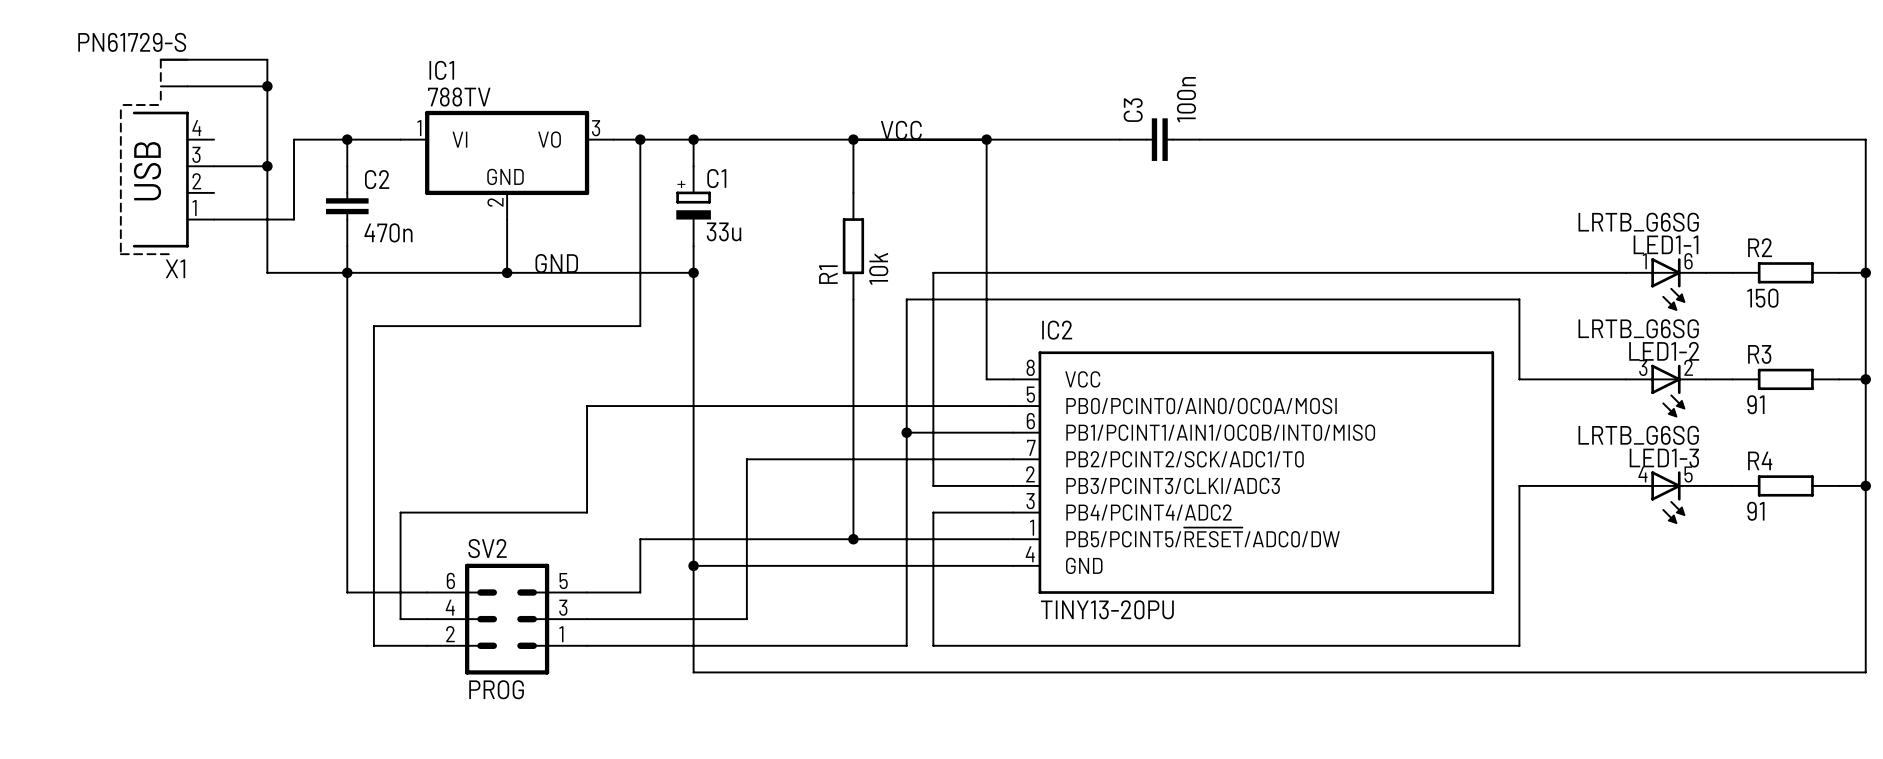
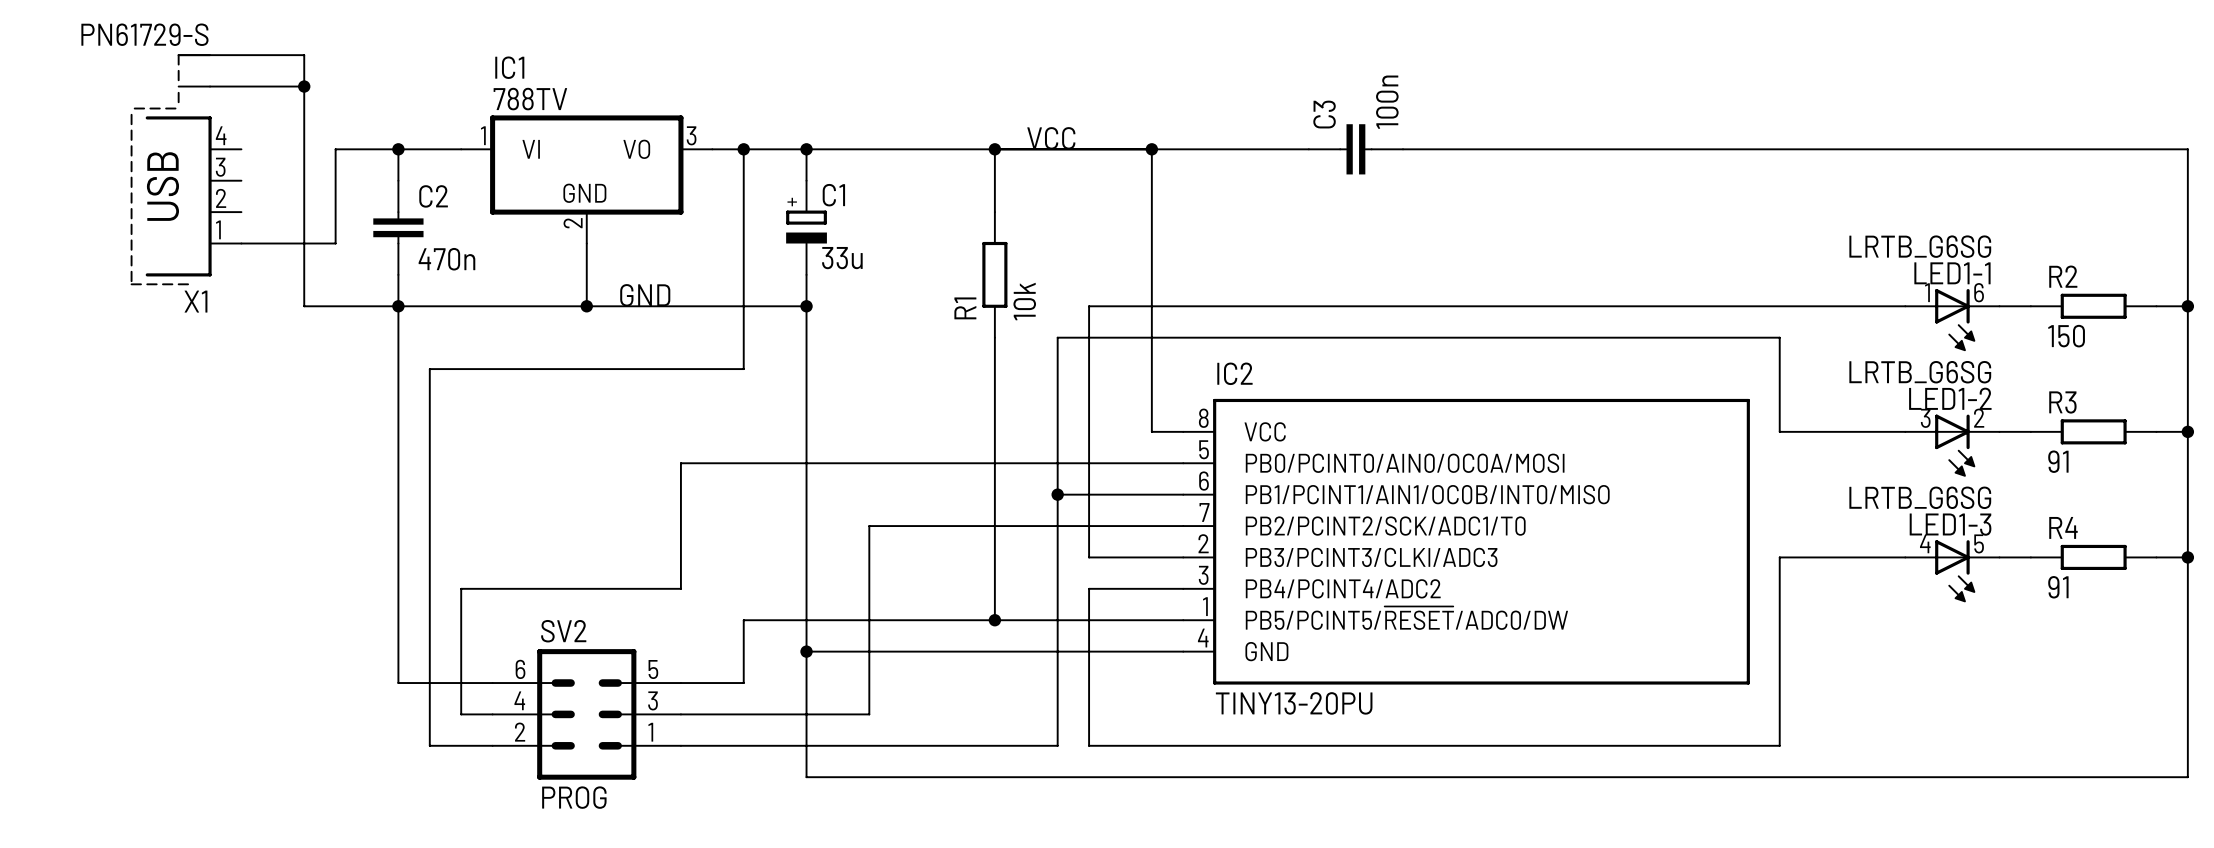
wire: (214, 166) (267, 166) -> none
junction: (267, 166) -> none

